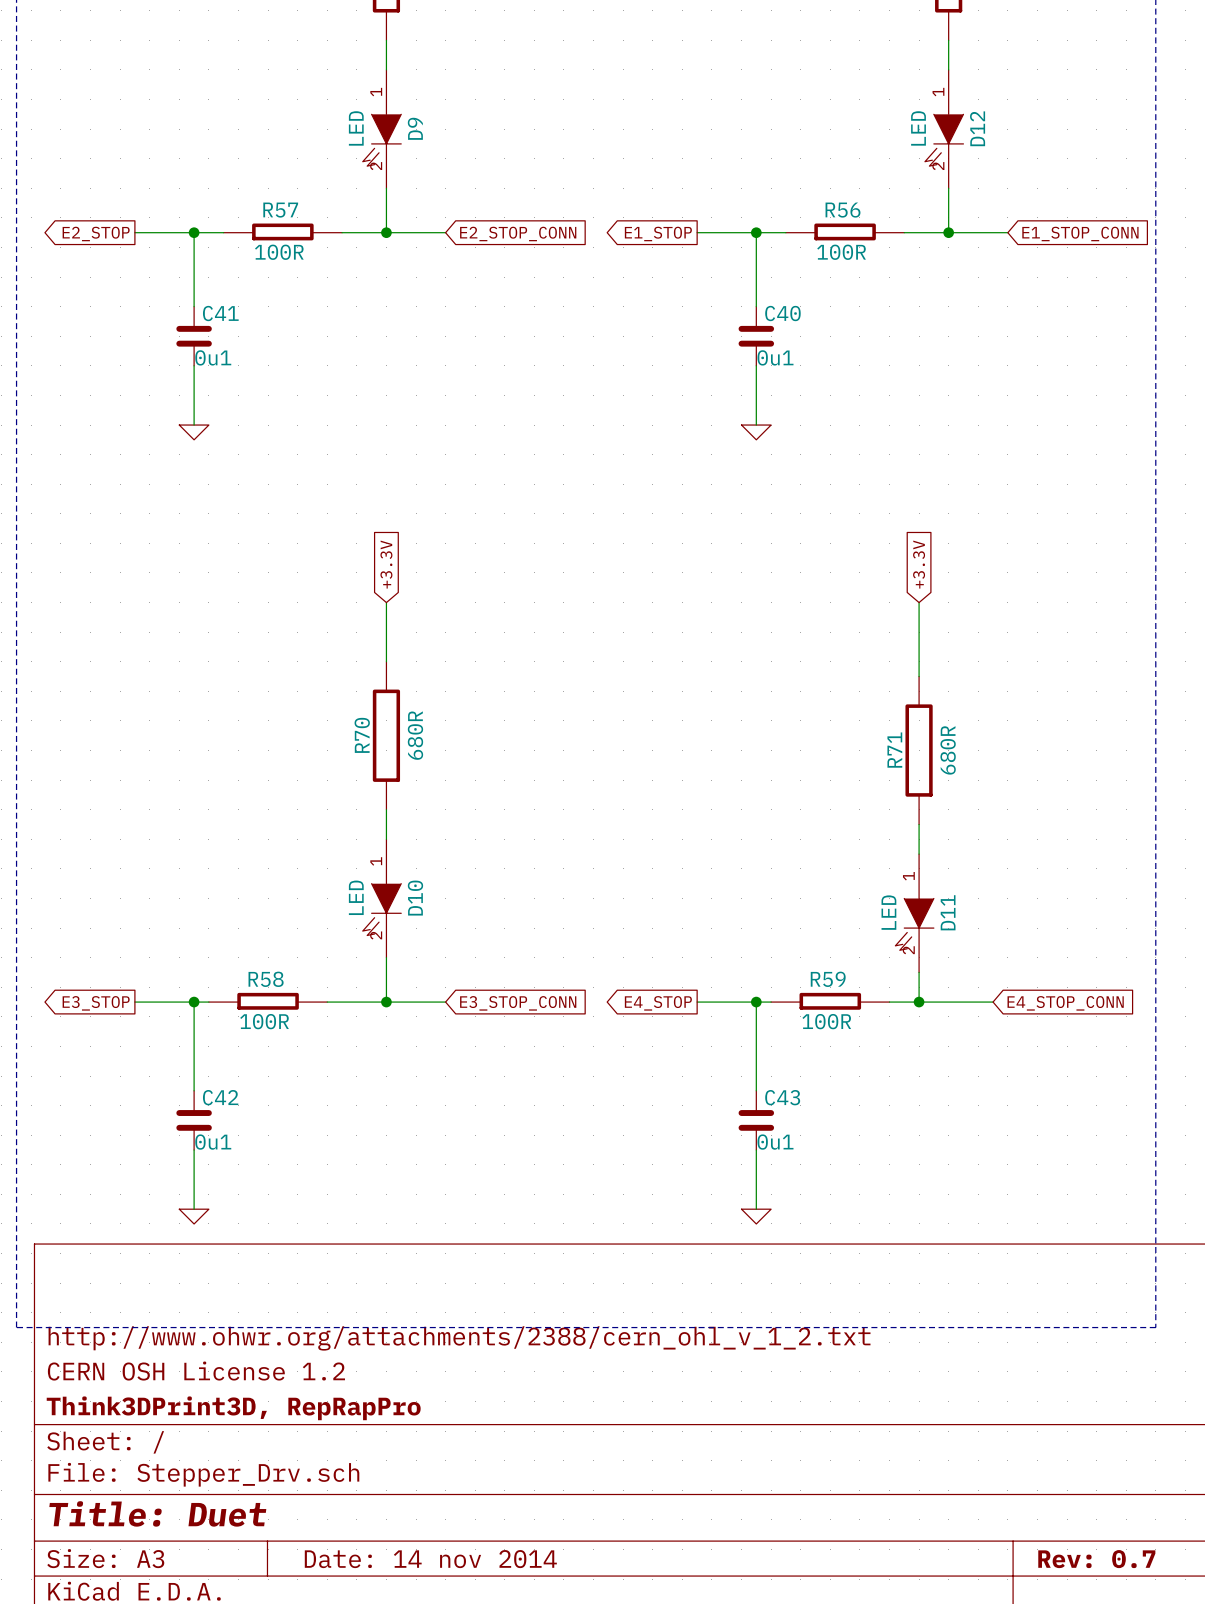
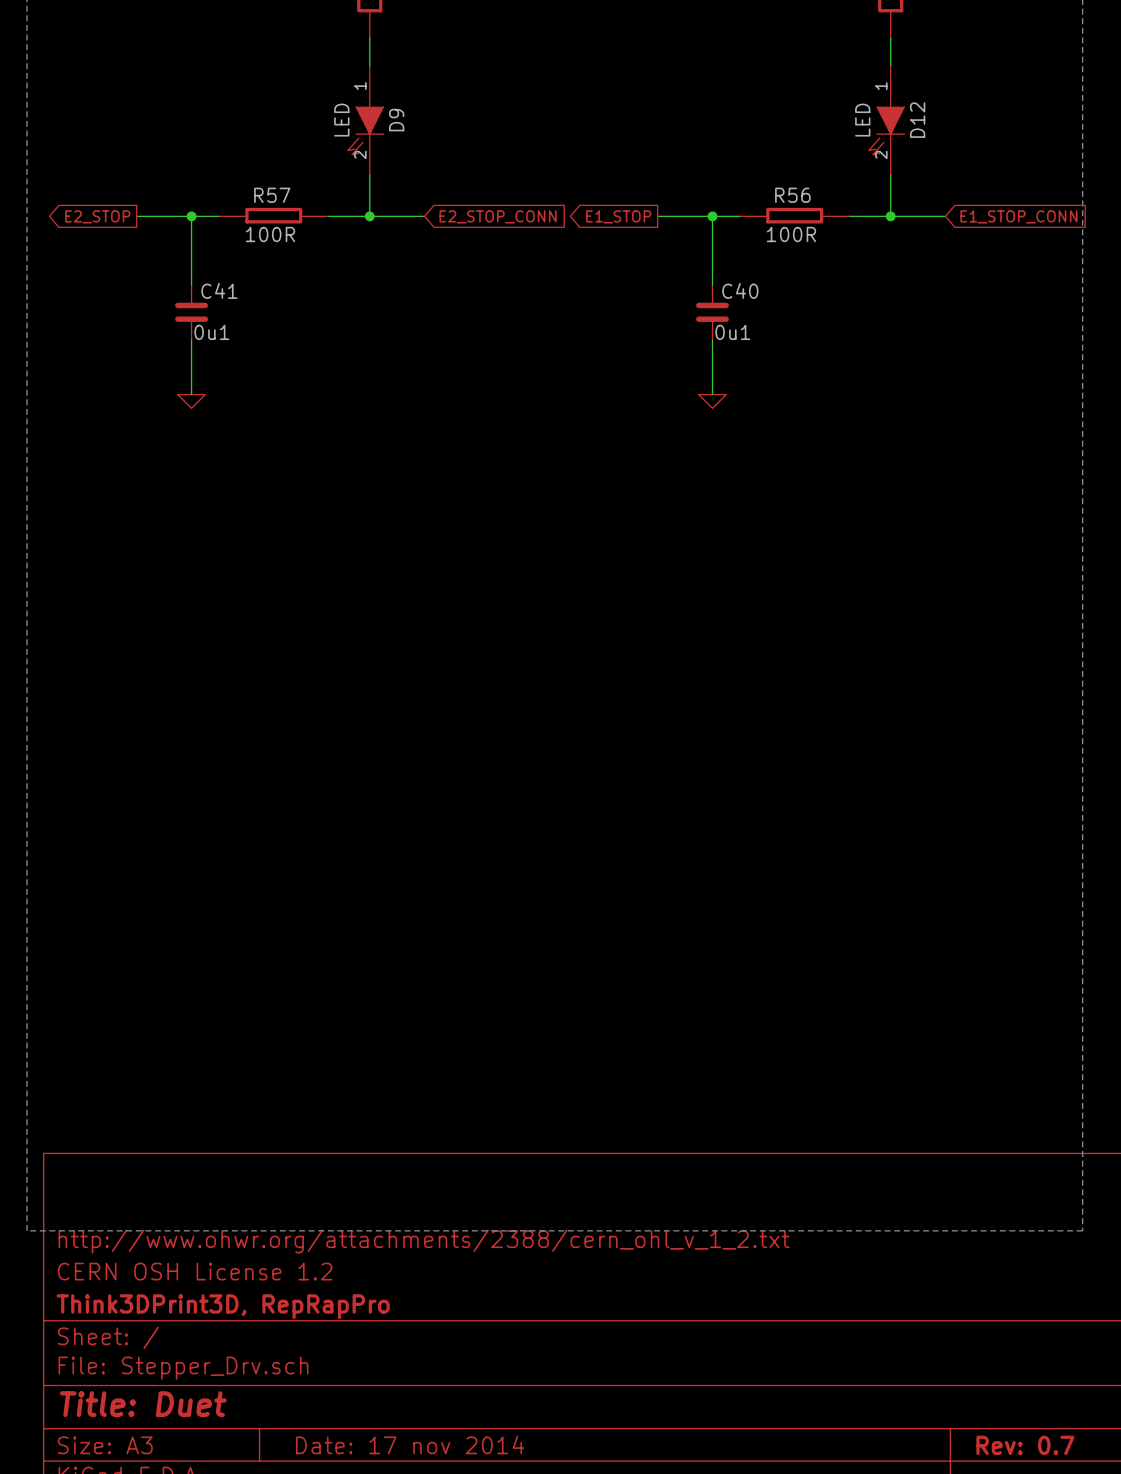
global label: +3.3V (386, 564) -> none
global label: +3.3V (919, 564) -> none
wire: (386, 602) (386, 661) -> none
wire: (919, 602) (919, 676) -> none
R70: 680R (386, 735) -> none
R71: 680R (919, 750) -> none
wire: (386, 809) (386, 839) -> none
wire: (919, 824) (919, 854) -> none
D10: LED (381, 898) -> none
D11: LED (914, 913) -> none
wire: (386, 957) (386, 1002) -> none
wire: (919, 972) (919, 1002) -> none
R58: 100R (268, 1001) -> none
R59: 100R (830, 1001) -> none
wire: (134, 1002) (208, 1002) -> none
wire: (194, 1002) (194, 1090) -> none
junction: (194, 1002) -> none
wire: (327, 1002) (445, 1002) -> none
junction: (386, 1002) -> none
wire: (697, 1002) (771, 1002) -> none
wire: (756, 1002) (756, 1090) -> none
junction: (756, 1002) -> none
wire: (889, 1002) (993, 1002) -> none
junction: (919, 1002) -> none
global label: E3_STOP (96, 1003) -> none
global label: E3_STOP_CONN (518, 1003) -> none
global label: E4_STOP (658, 1003) -> none
global label: E4_STOP_CONN (1065, 1003) -> none
C42: 0u1 (194, 1120) -> none
C43: 0u1 (756, 1120) -> none
wire: (194, 1150) (194, 1209) -> none
wire: (756, 1150) (756, 1209) -> none
power symbol: (194, 1216) -> none
power symbol: (756, 1216) -> none
title block: Date: 14 nov 2014 (430, 1559) -> Date: 17 nov 2014 (410, 1444)

